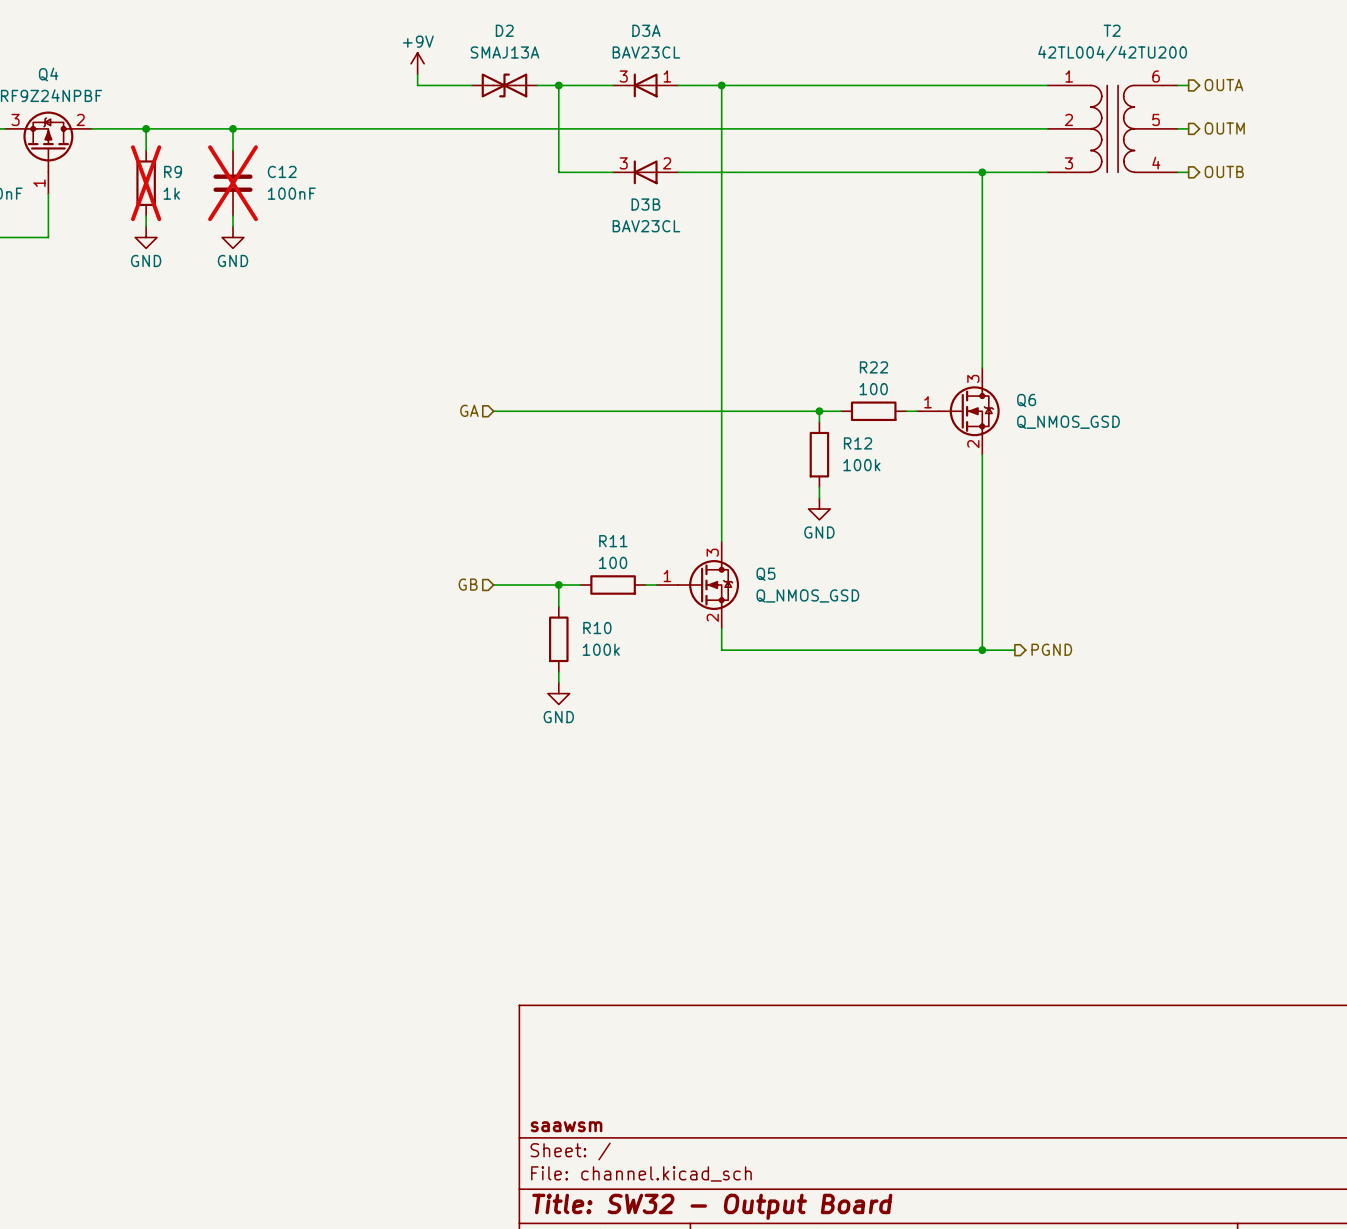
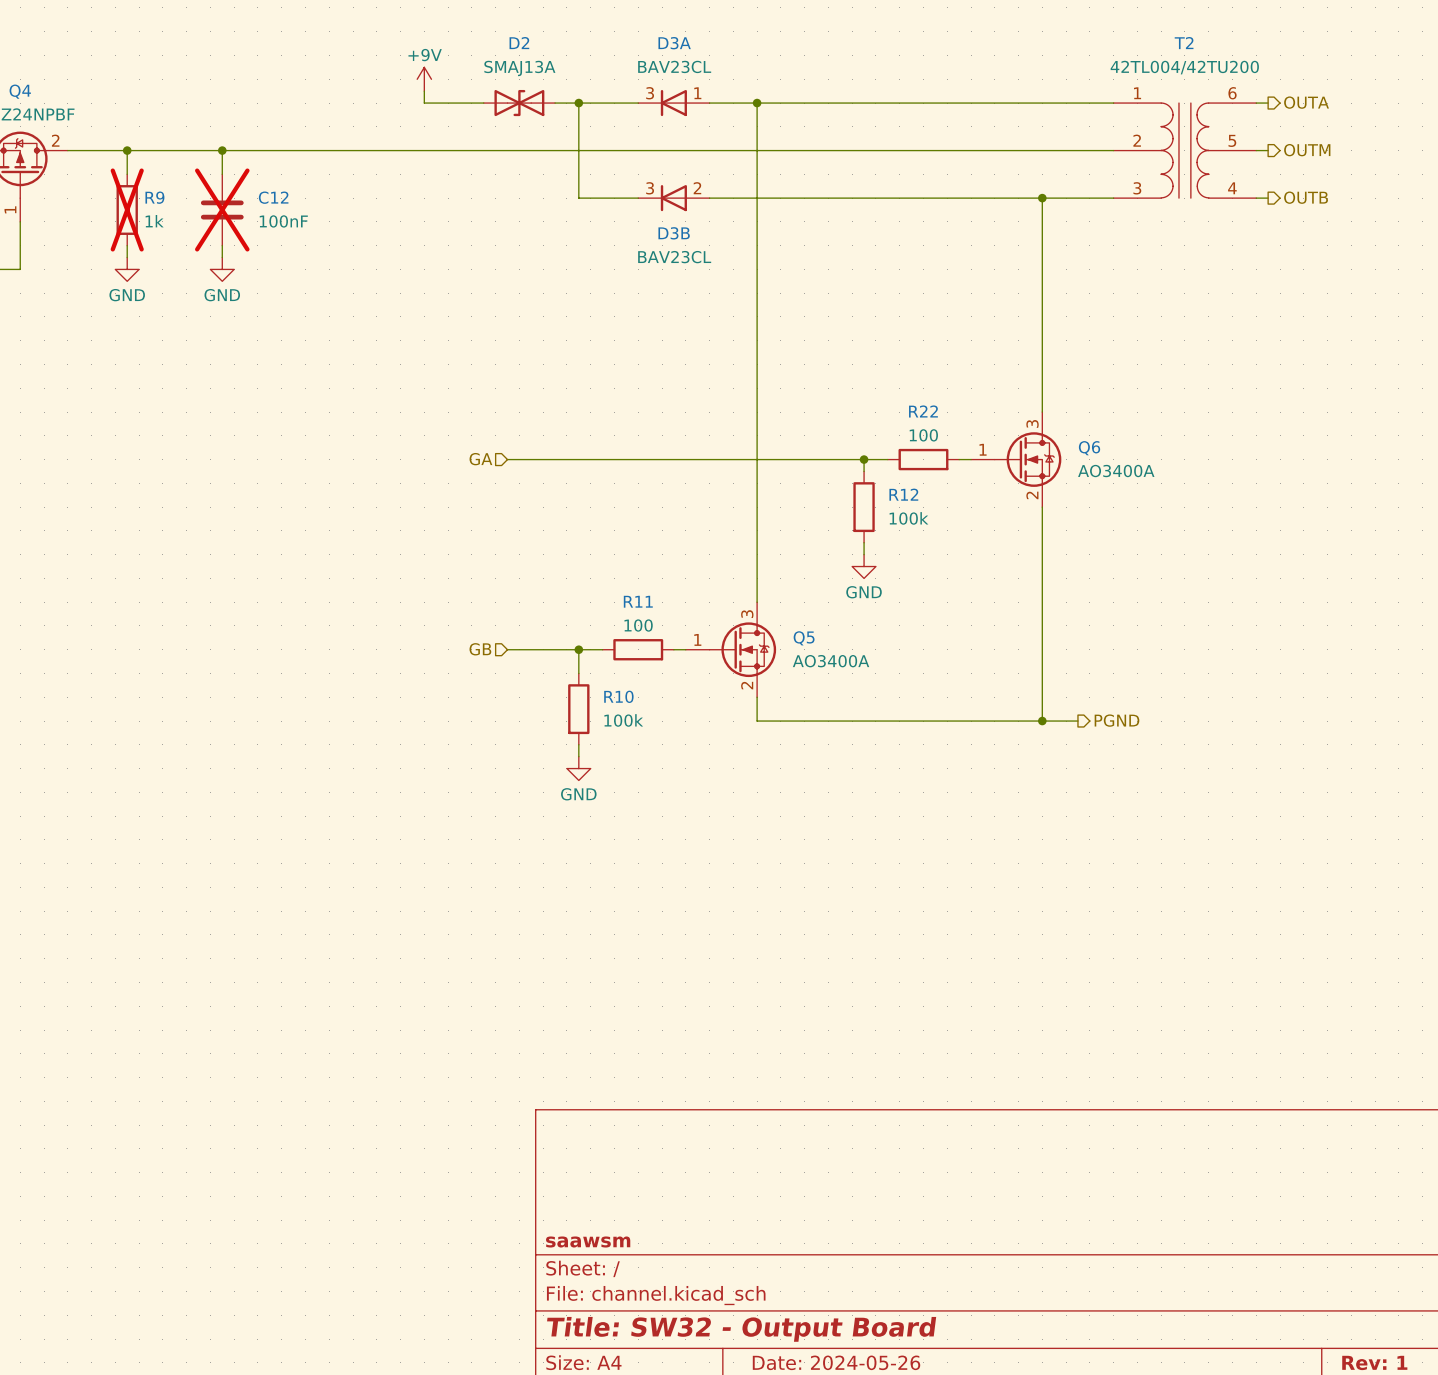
Q6 value: Q_NMOS_GSD (1068, 422) -> AO3400A (1116, 471)
Q5 value: Q_NMOS_GSD (807, 595) -> AO3400A (831, 661)

